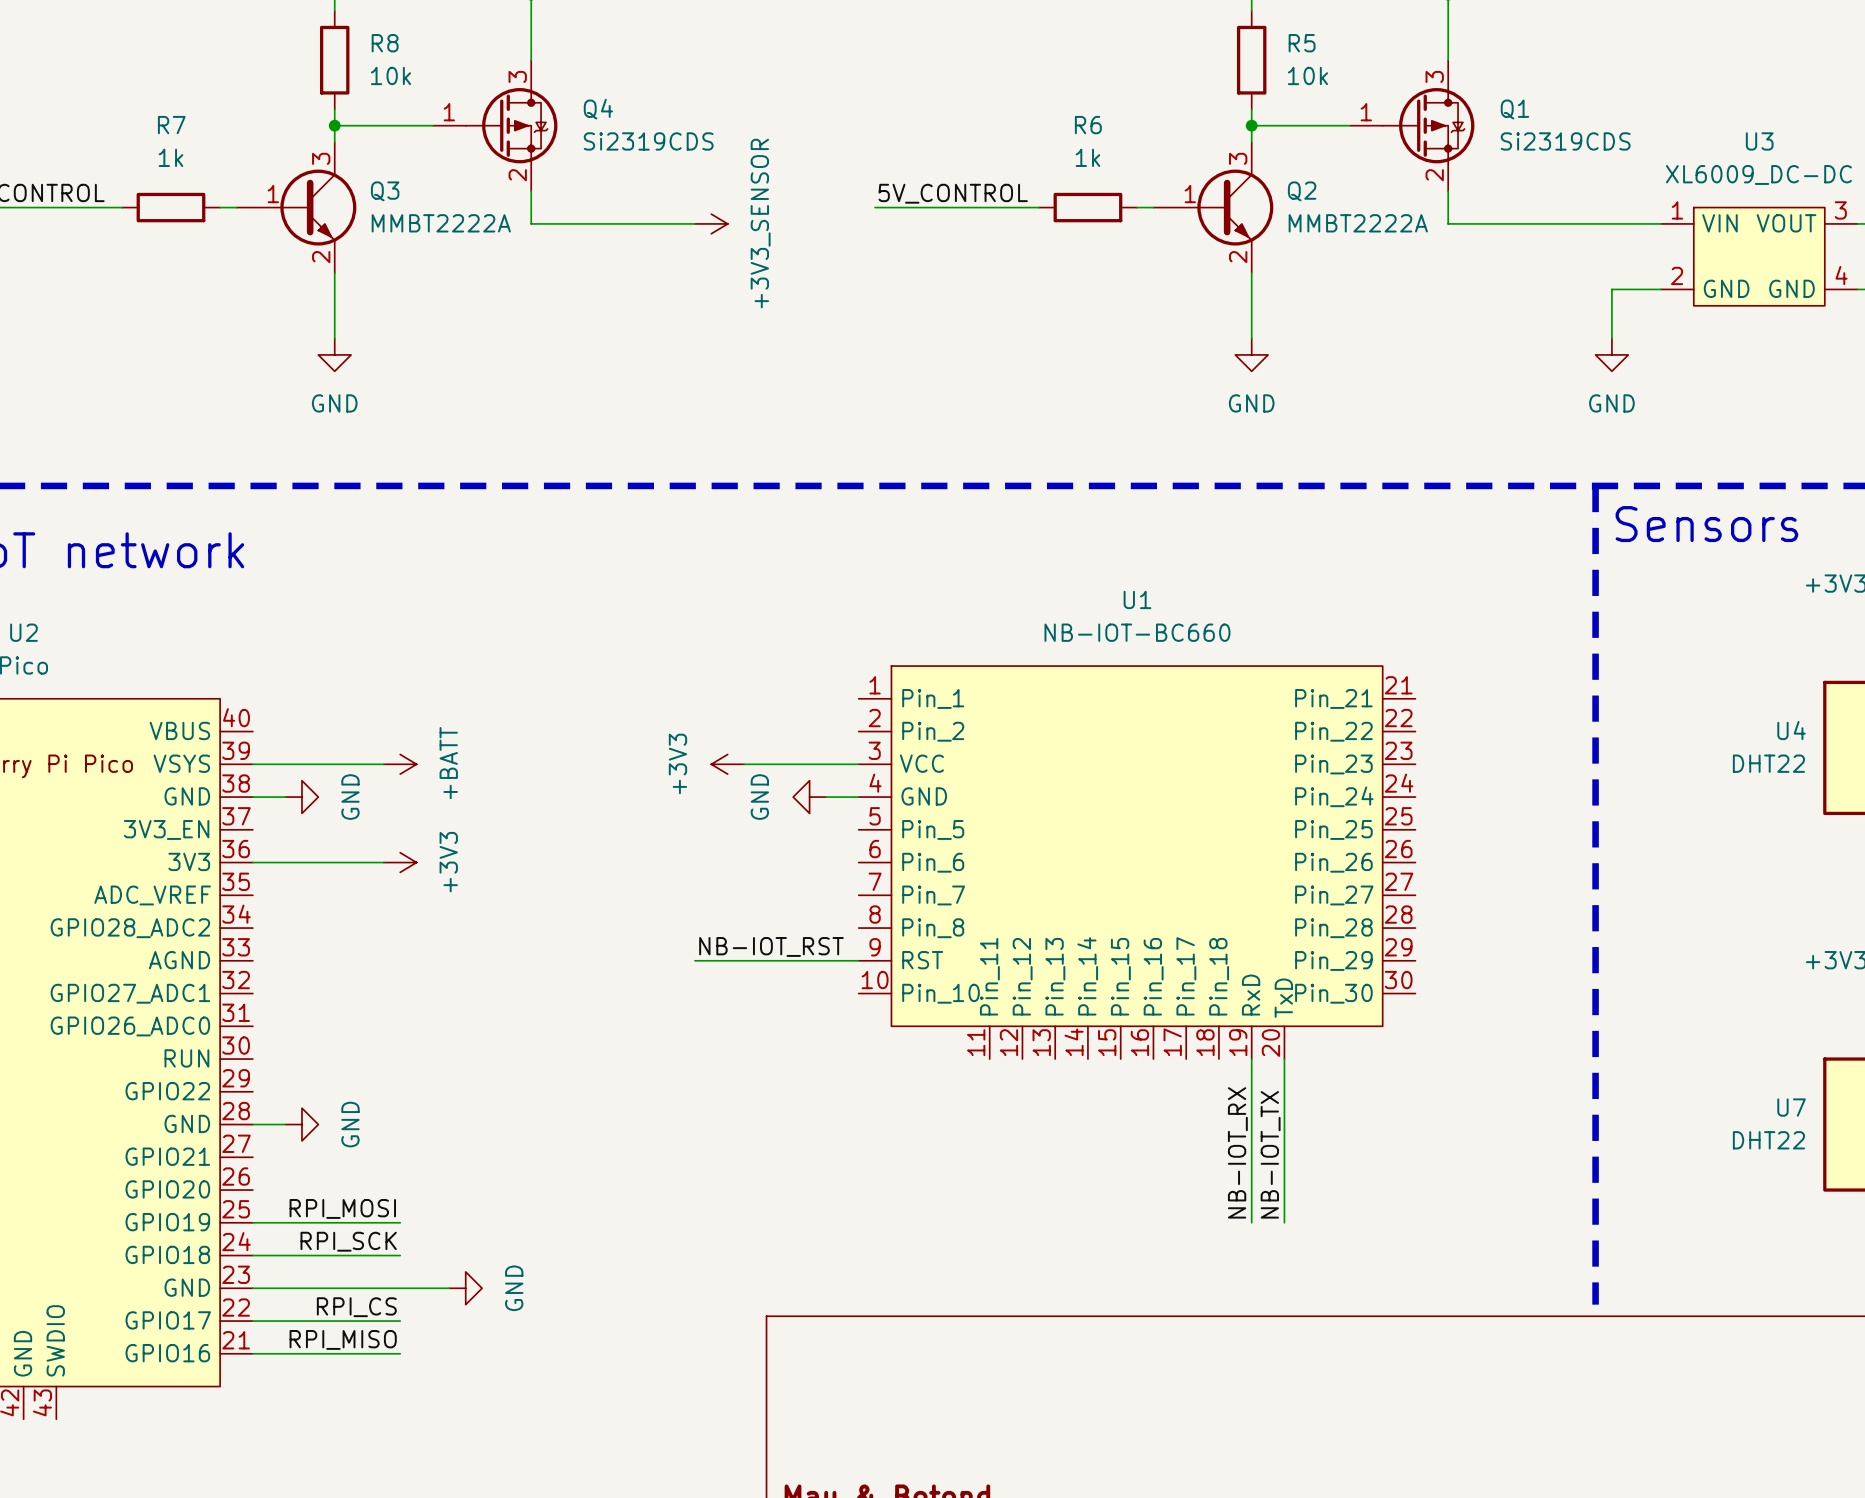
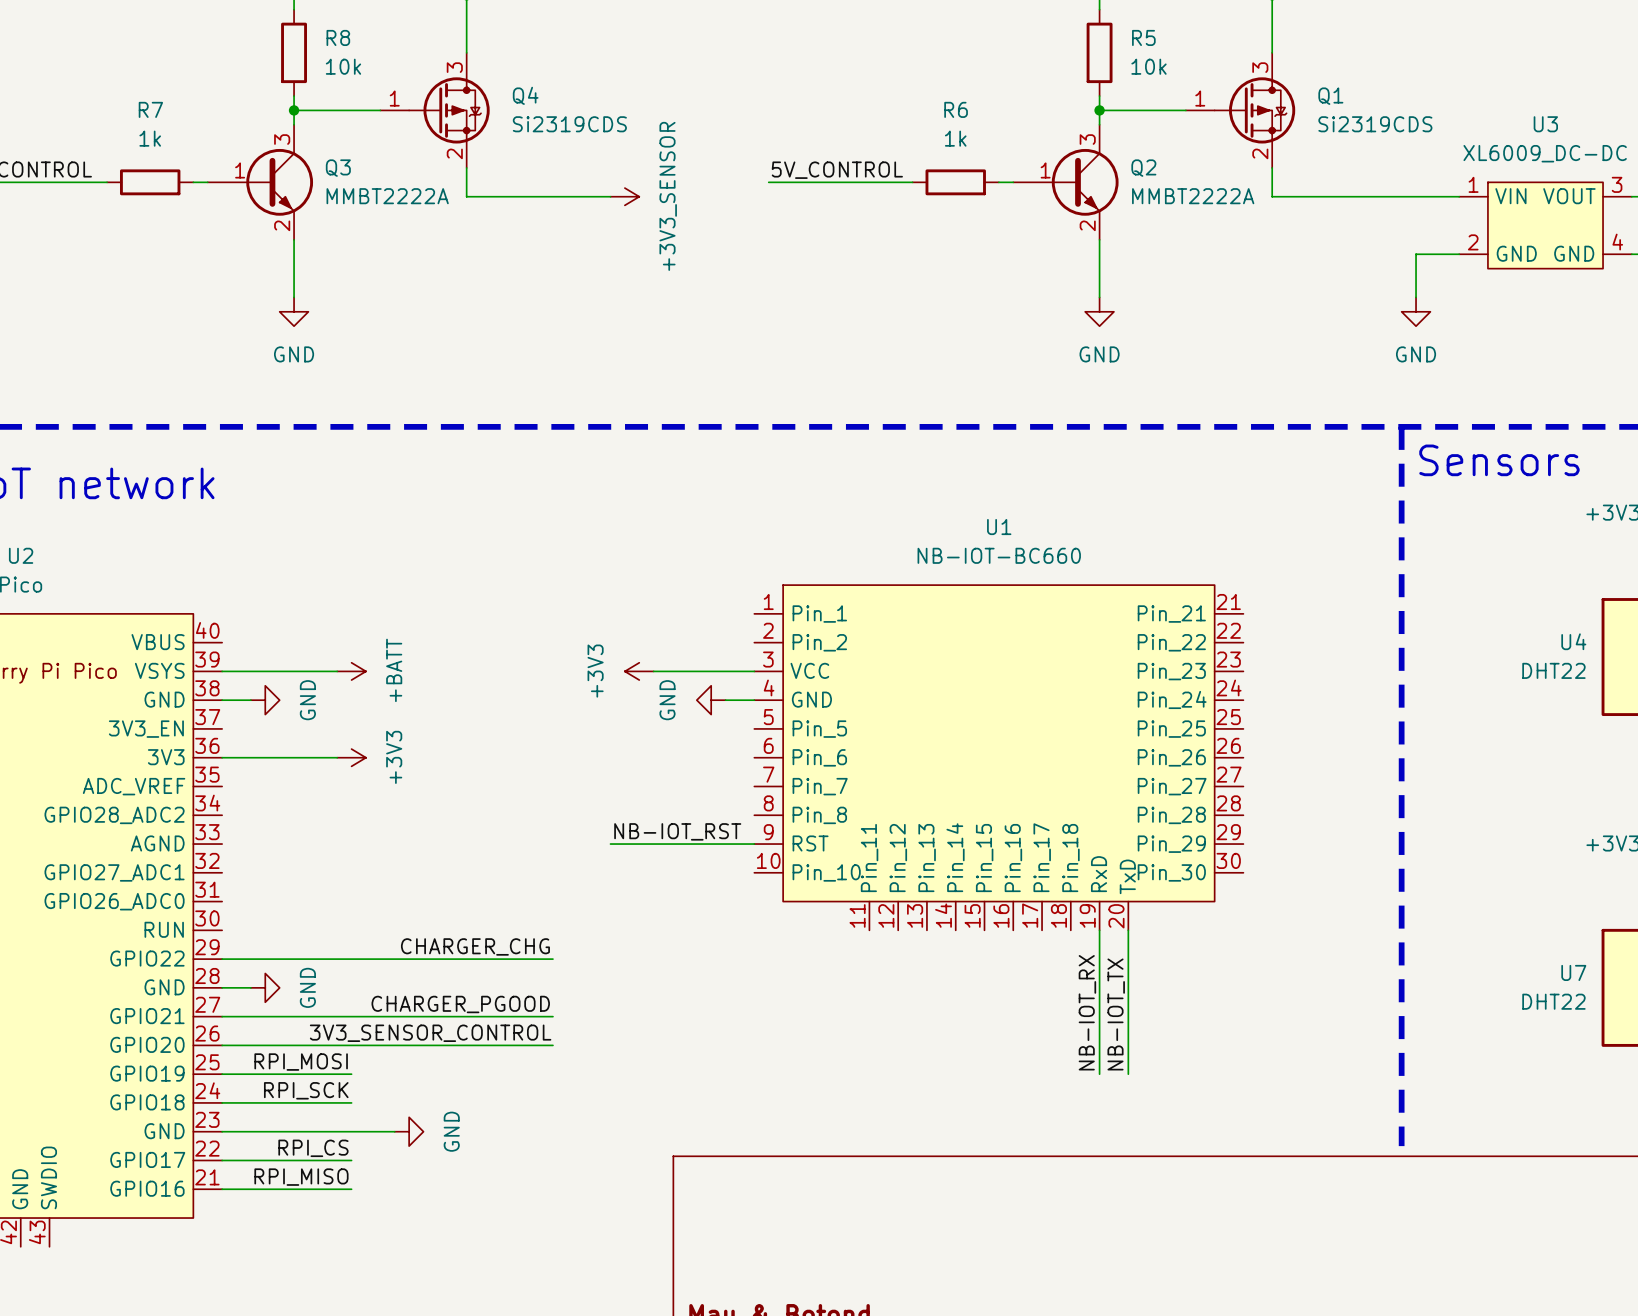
label: none -> CHARGER_CHG (475, 946)
wire: none -> (222, 959) (552, 959)
label: none -> CHARGER_PGOOD (460, 1004)
wire: none -> (222, 1016) (552, 1016)
label: none -> 3V3_SENSOR_CONTROL (430, 1033)
wire: none -> (222, 1045) (552, 1045)

